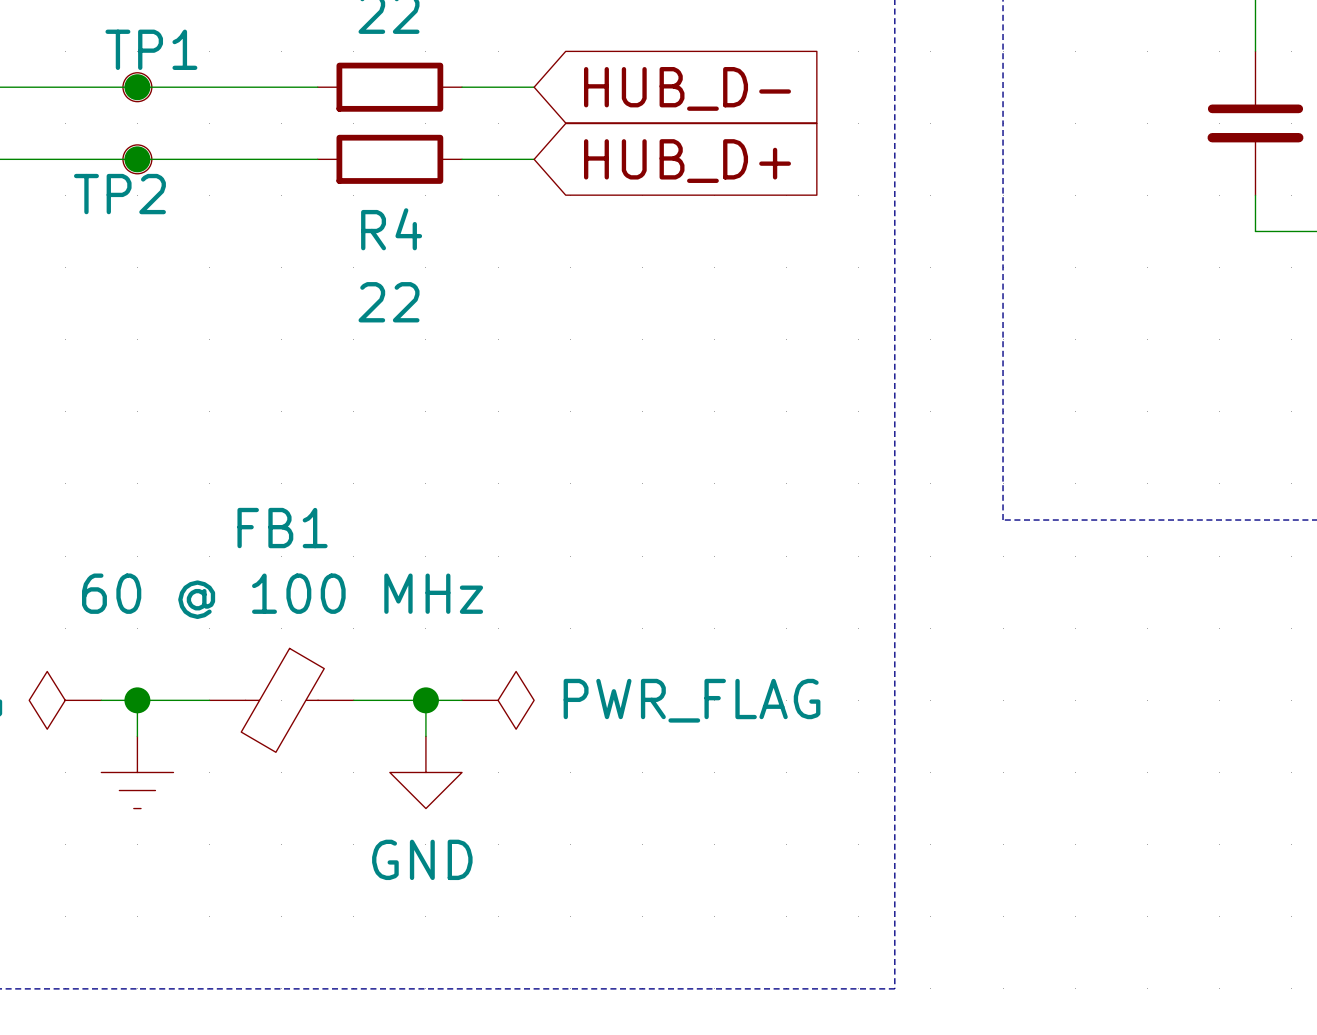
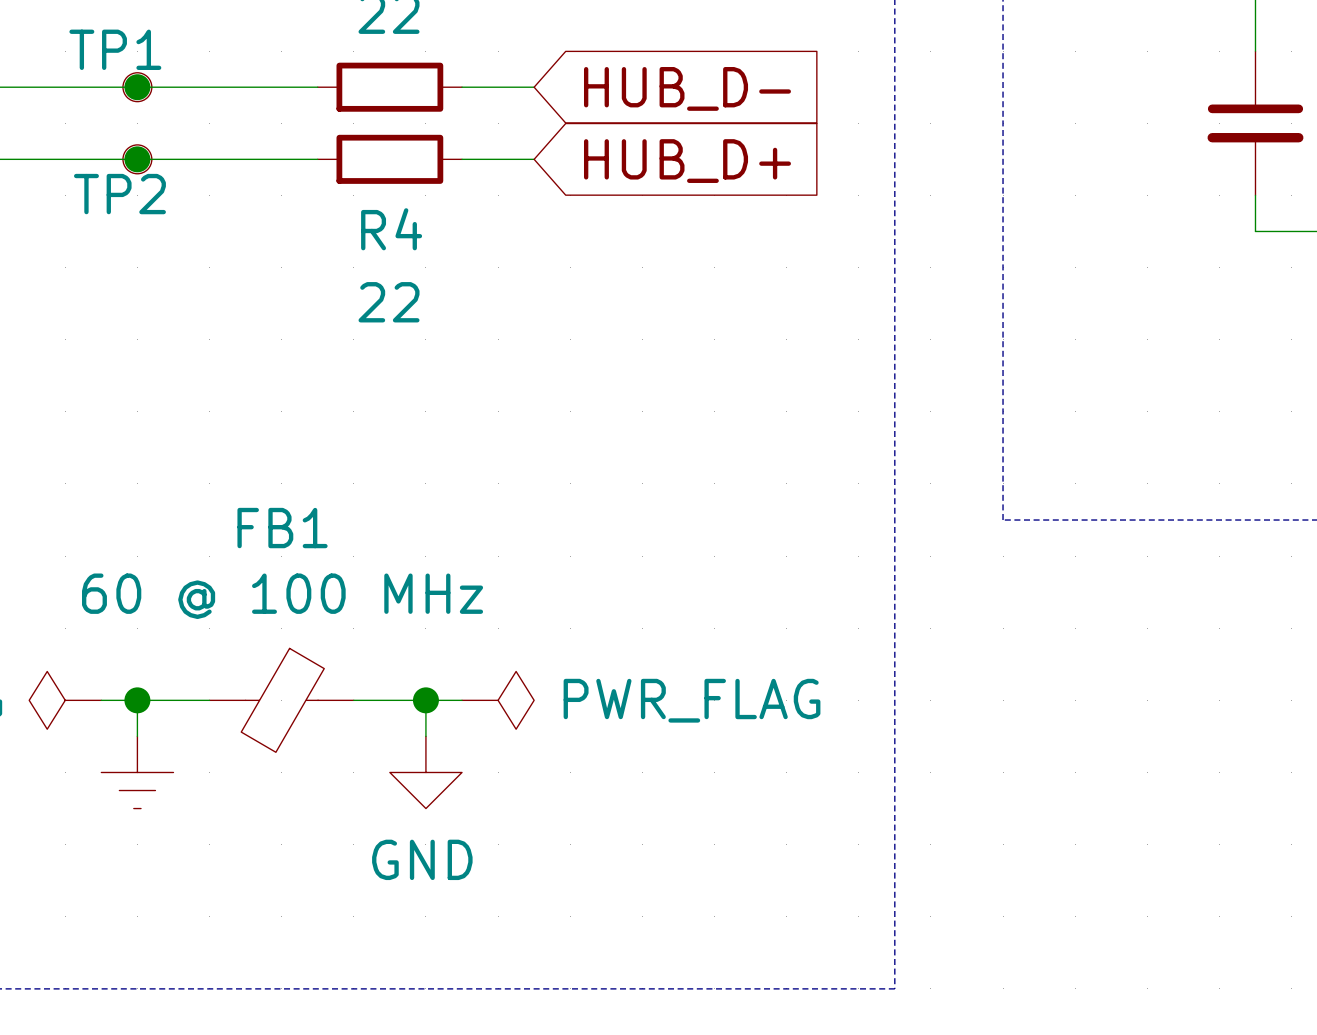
TP1 name position: TP1 (151, 49) -> TP1 (115, 49)

